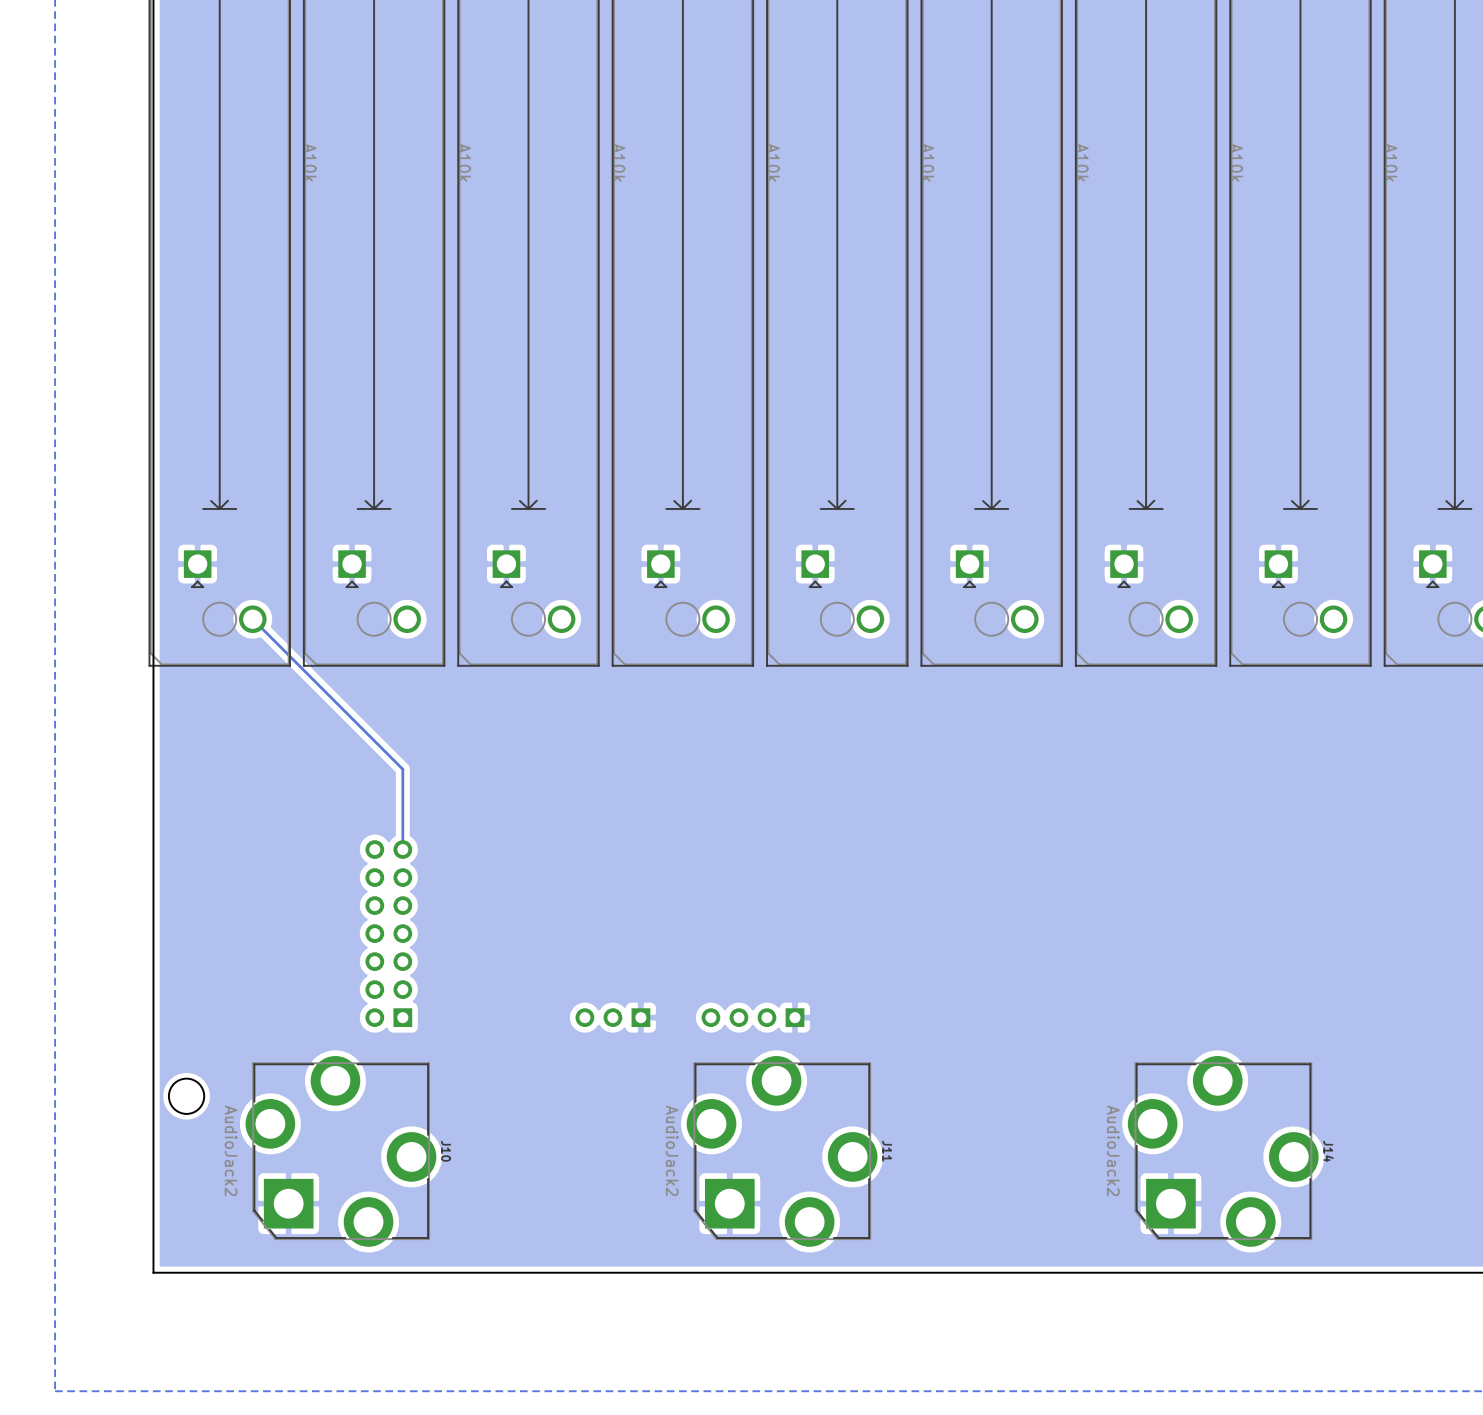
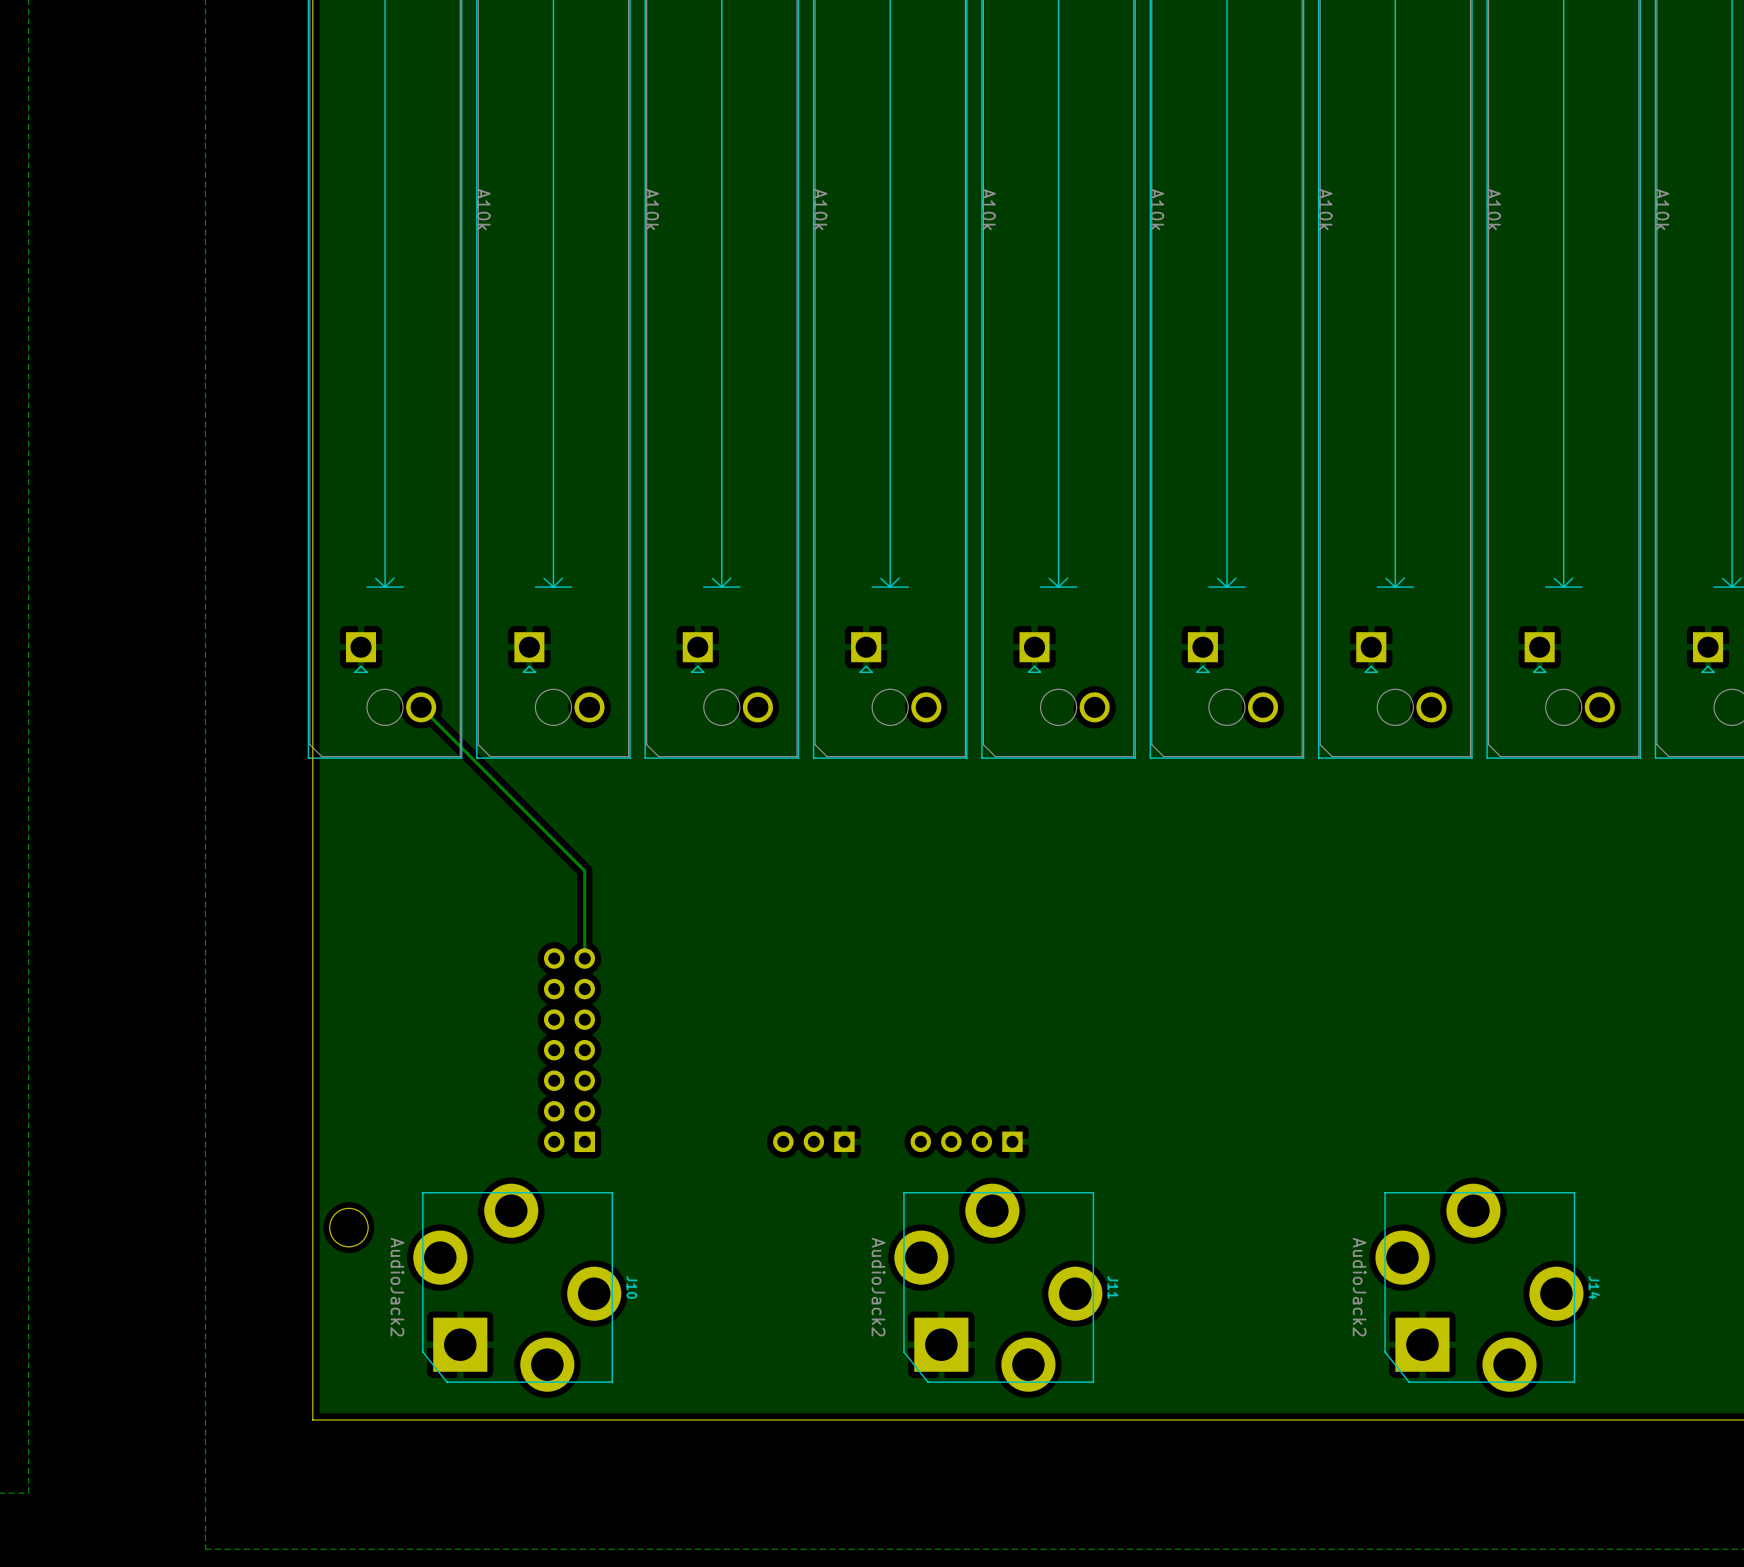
J10 footprint: [245, 1056, 437, 1247] -> [413, 1183, 622, 1392]
J11 footprint: [686, 1056, 878, 1247] -> [894, 1183, 1103, 1392]
J14 footprint: [1127, 1056, 1319, 1247] -> [1375, 1183, 1584, 1392]

